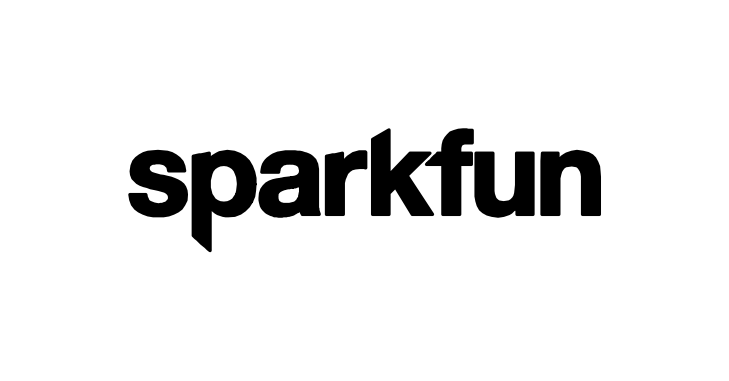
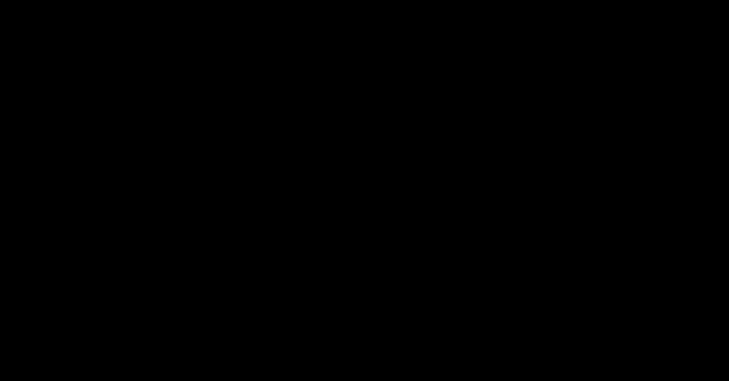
drawing: [128, 128, 602, 253] -> none

